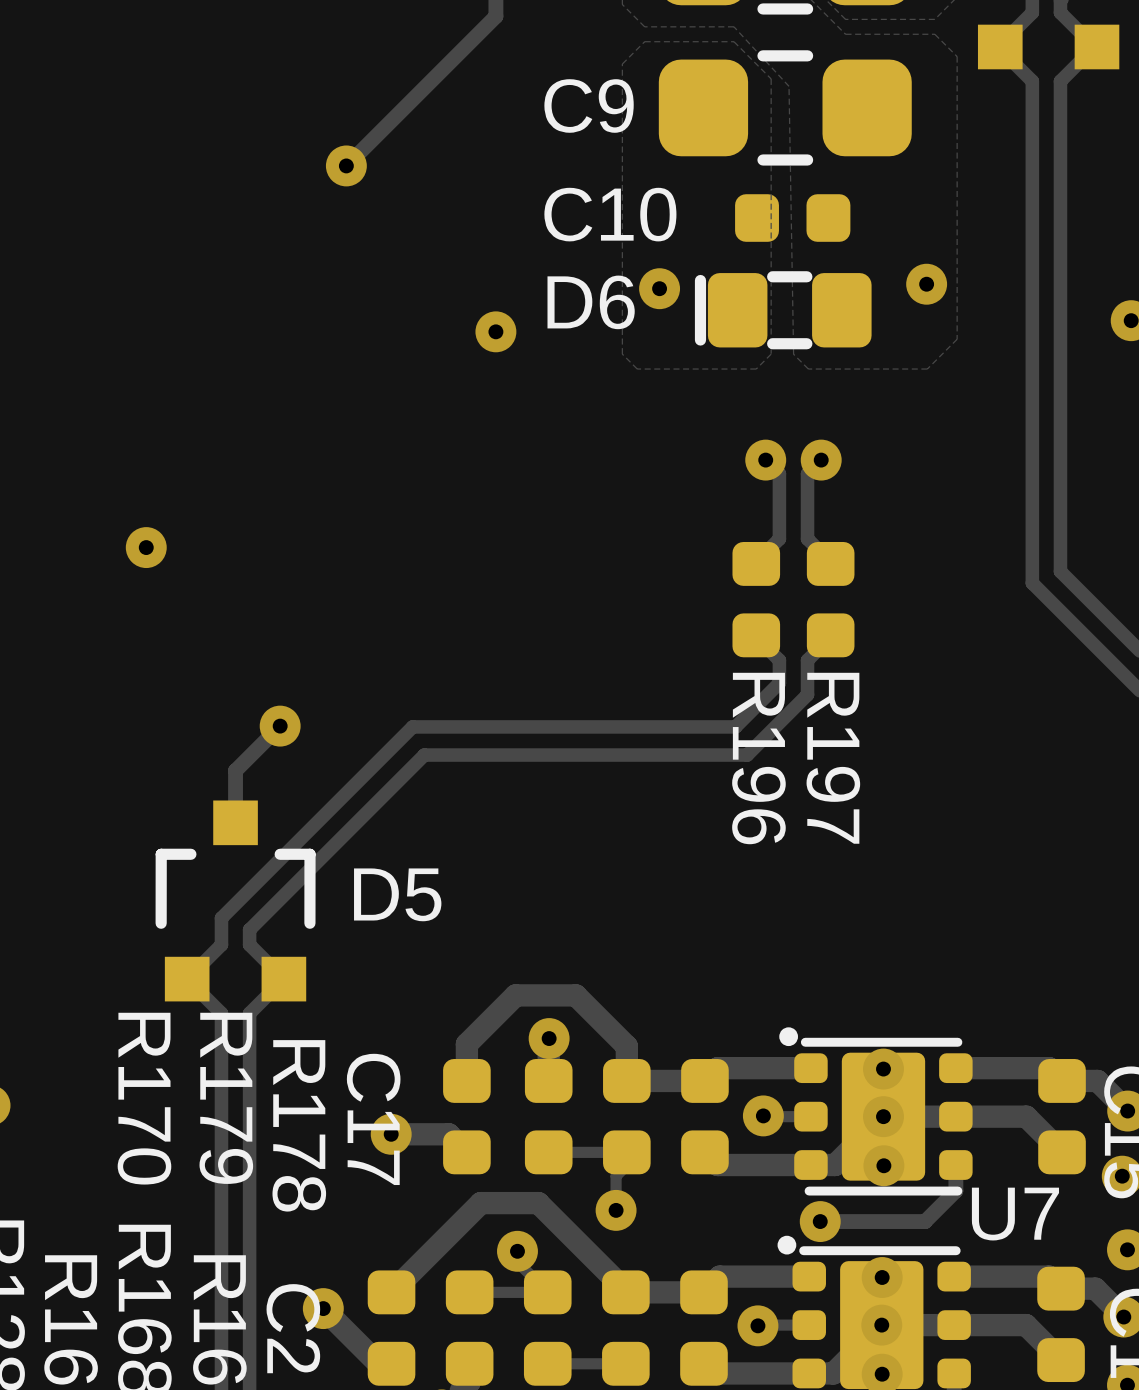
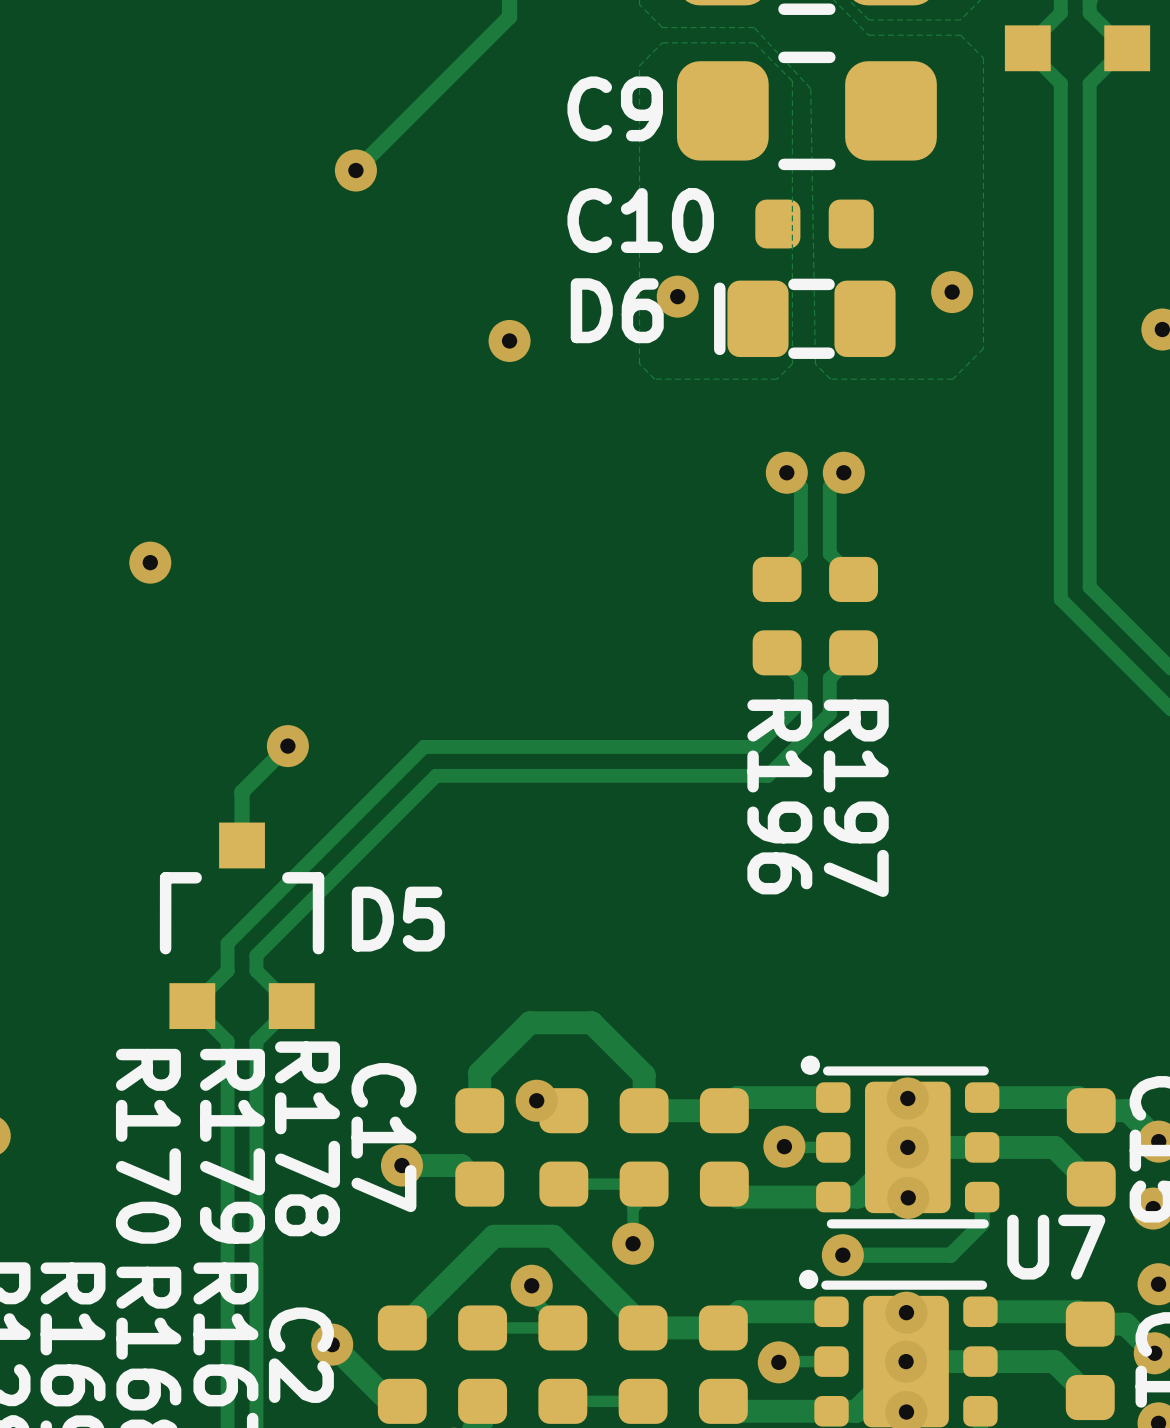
via position: (549, 1038) -> (536, 1100)

